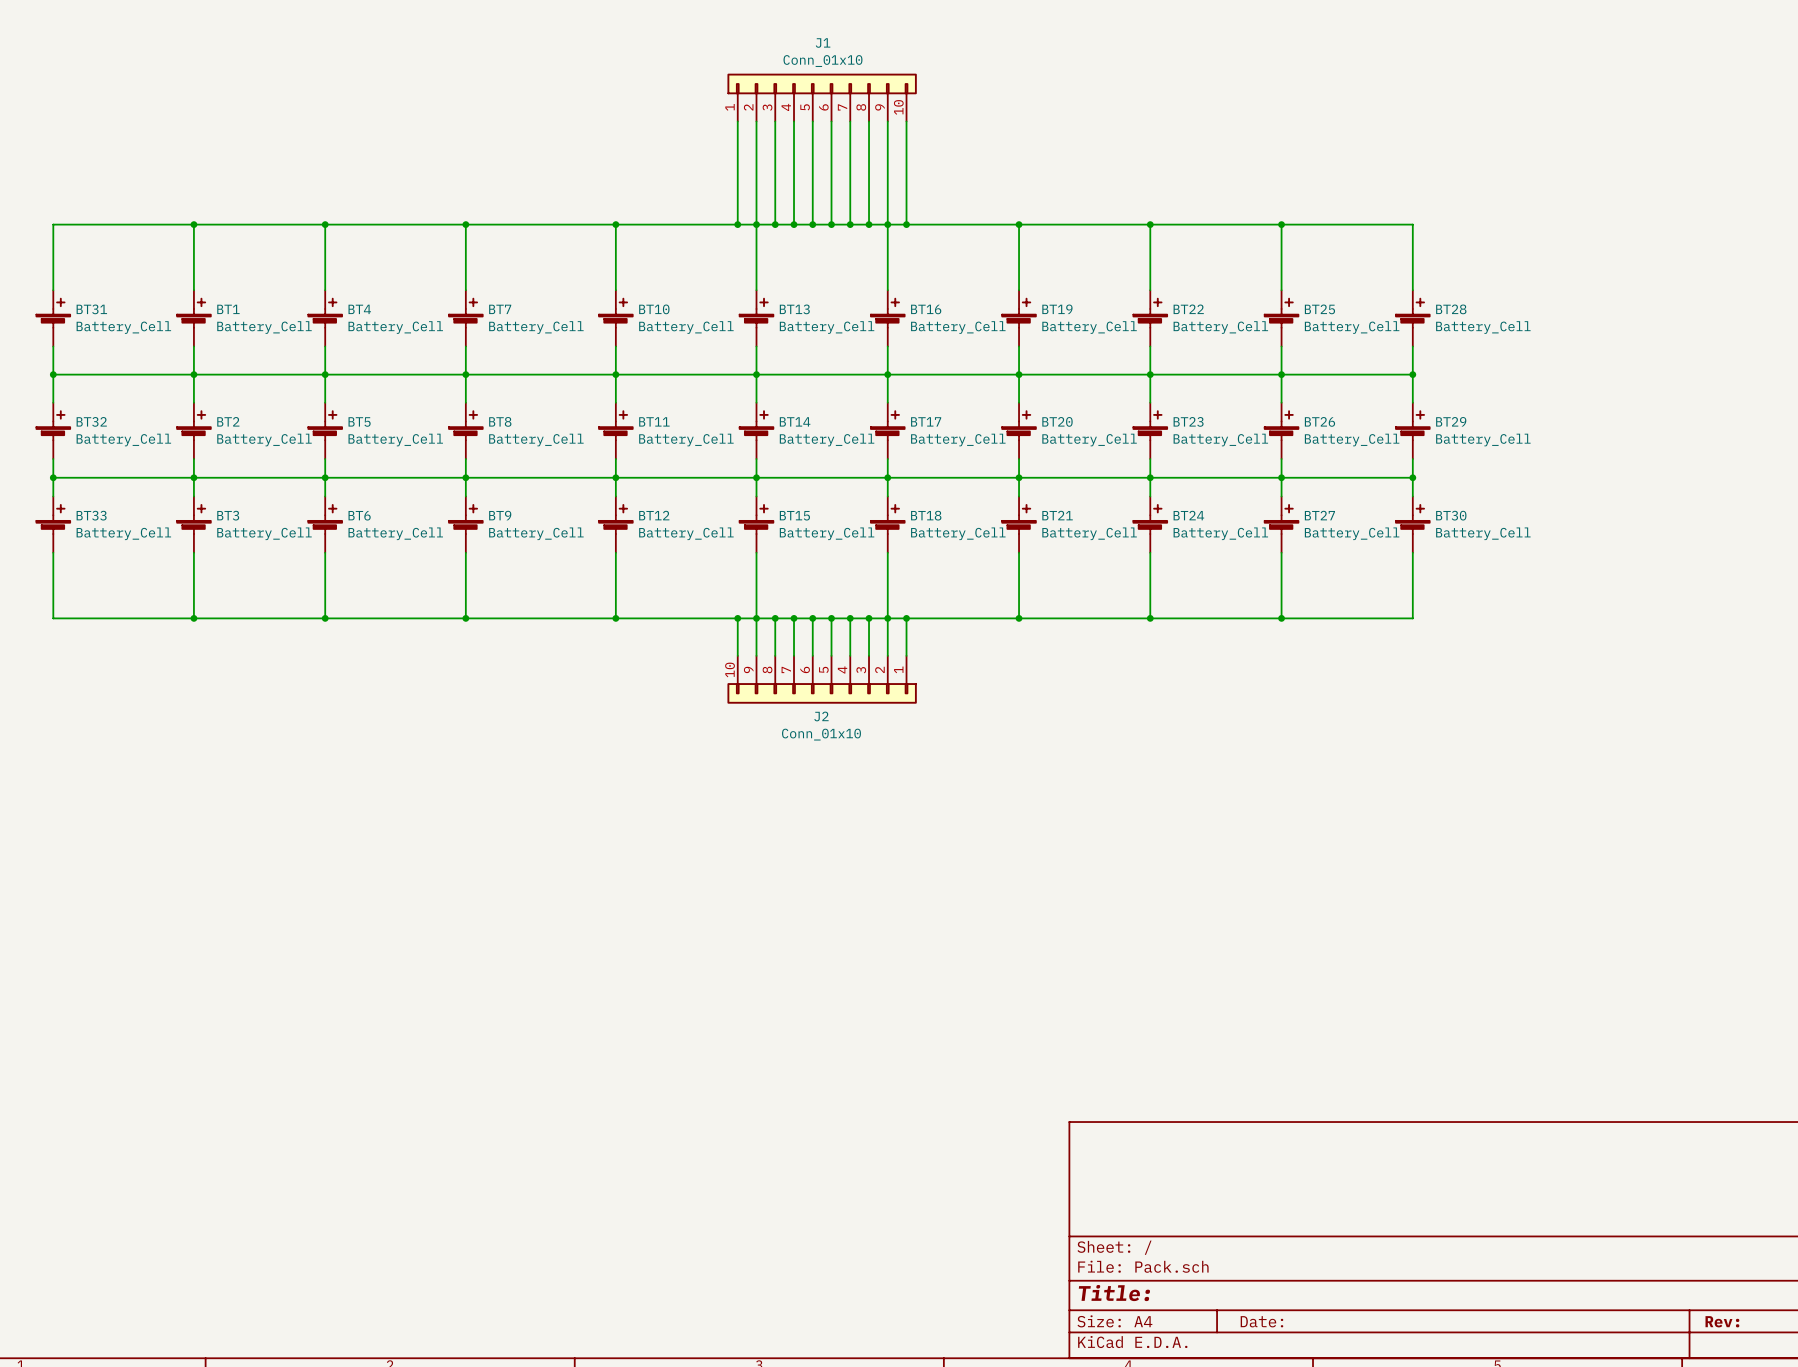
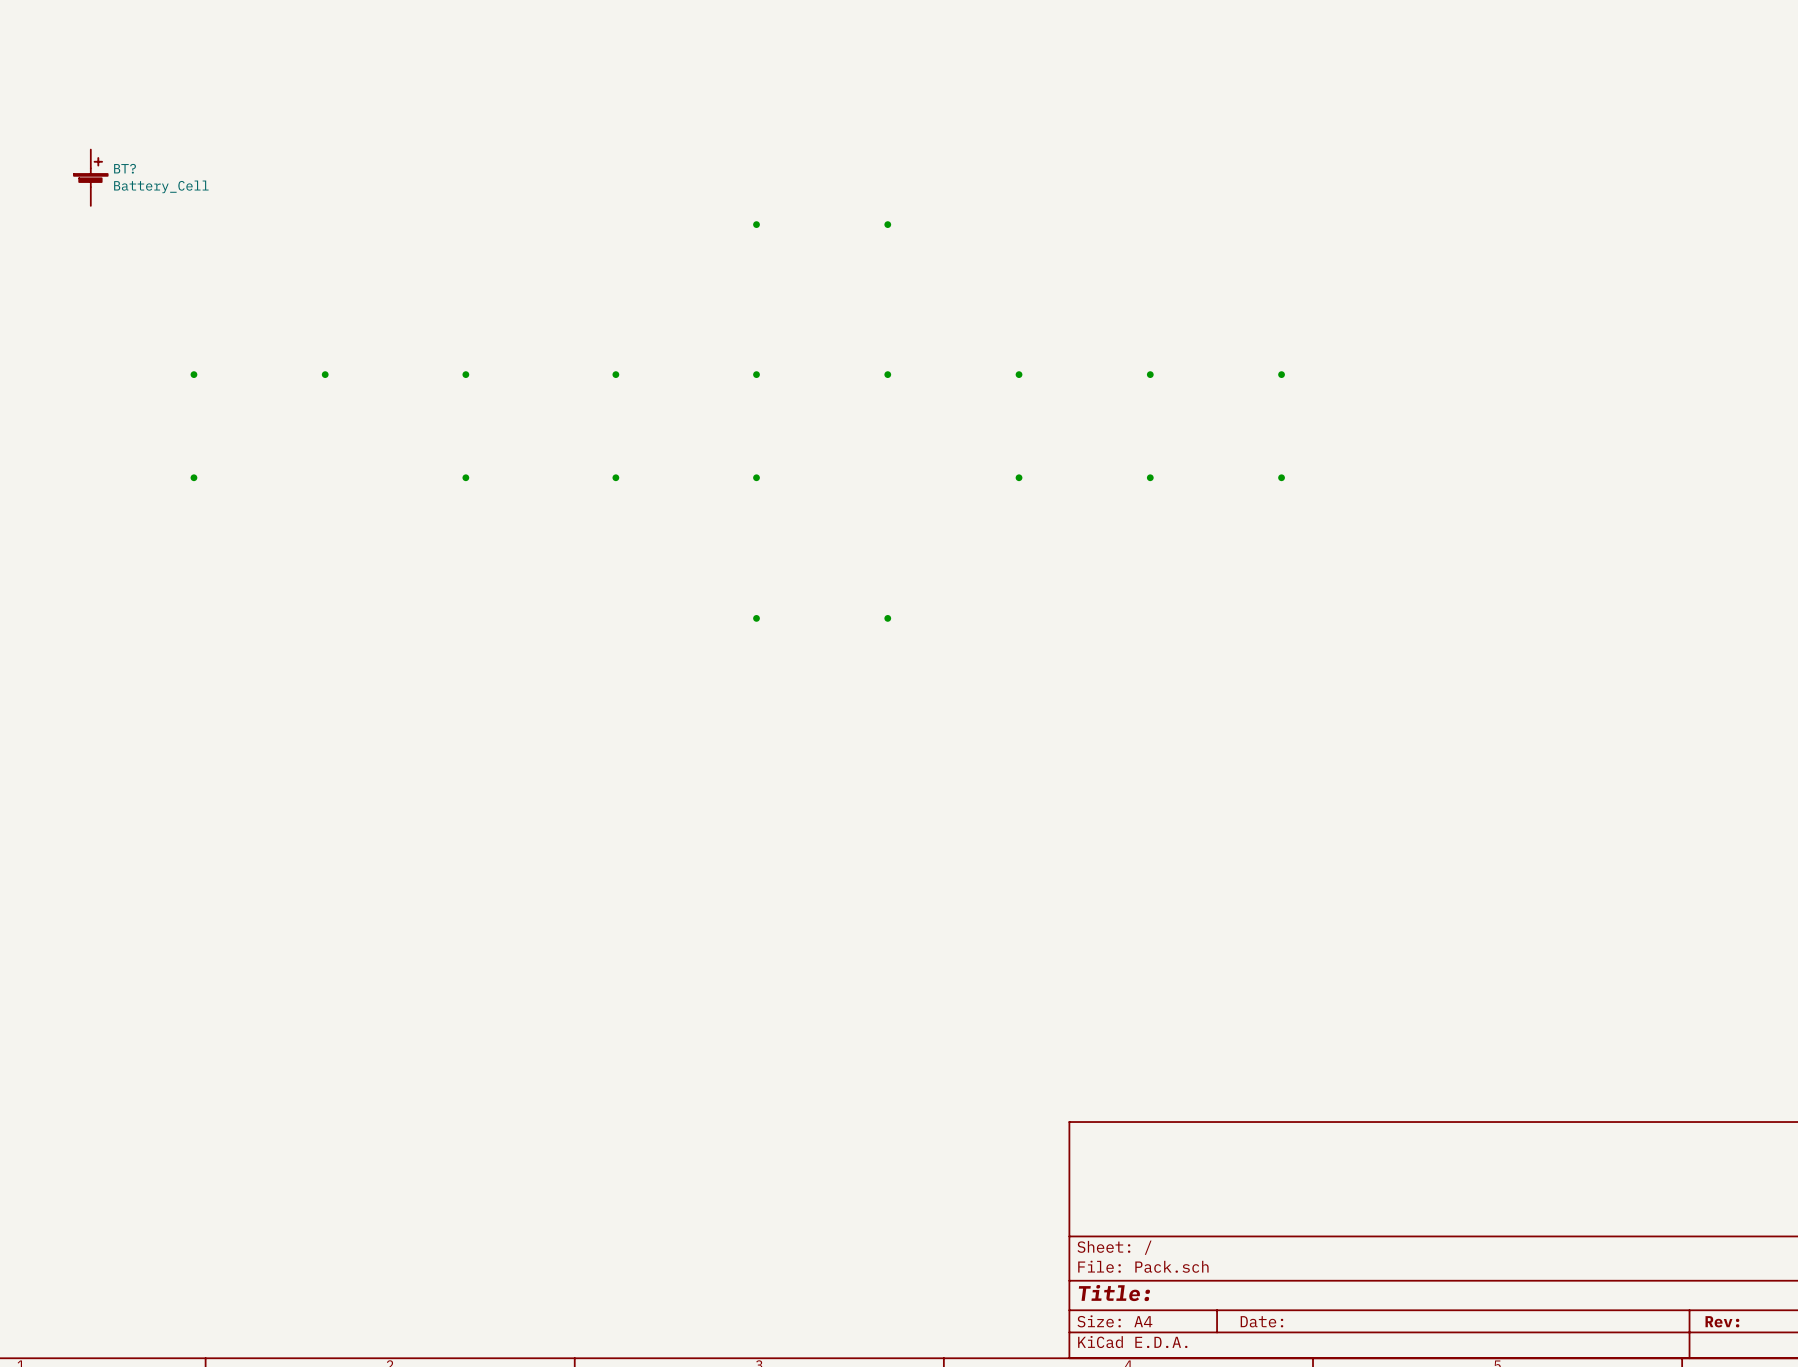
J1: Conn_01x10 (822, 97) -> none
wire: (737, 121) (737, 224) -> none
wire: (756, 121) (756, 290) -> none
wire: (775, 121) (775, 224) -> none
wire: (794, 121) (794, 224) -> none
wire: (812, 121) (812, 224) -> none
wire: (831, 121) (831, 224) -> none
wire: (850, 121) (850, 224) -> none
wire: (869, 121) (869, 224) -> none
wire: (887, 121) (887, 290) -> none
wire: (906, 121) (906, 224) -> none
BT?: none -> Battery_Cell (90, 177)
wire: (193, 224) (193, 290) -> none
junction: (193, 224) -> none
wire: (325, 224) (325, 290) -> none
junction: (325, 224) -> none
wire: (465, 224) (465, 290) -> none
junction: (465, 224) -> none
wire: (615, 224) (615, 290) -> none
junction: (615, 224) -> none
junction: (737, 224) -> none
junction: (775, 224) -> none
junction: (794, 224) -> none
junction: (812, 224) -> none
junction: (831, 224) -> none
junction: (850, 224) -> none
junction: (869, 224) -> none
junction: (906, 224) -> none
wire: (1019, 224) (1019, 290) -> none
junction: (1019, 224) -> none
wire: (1150, 224) (1150, 290) -> none
junction: (1150, 224) -> none
wire: (1281, 224) (1281, 290) -> none
junction: (1281, 224) -> none
wire: (53, 290) (53, 224) (1412, 224) (1412, 290) -> none
BT31: Battery_Cell (53, 318) -> none
BT1: Battery_Cell (193, 318) -> none
BT4: Battery_Cell (325, 318) -> none
BT7: Battery_Cell (465, 318) -> none
BT10: Battery_Cell (615, 318) -> none
BT13: Battery_Cell (756, 318) -> none
BT16: Battery_Cell (887, 318) -> none
BT19: Battery_Cell (1019, 318) -> none
BT22: Battery_Cell (1150, 318) -> none
BT25: Battery_Cell (1281, 318) -> none
BT28: Battery_Cell (1412, 318) -> none
wire: (53, 346) (53, 402) -> none
wire: (193, 346) (193, 402) -> none
wire: (325, 346) (325, 402) -> none
wire: (465, 346) (465, 402) -> none
wire: (615, 346) (615, 402) -> none
wire: (756, 346) (756, 402) -> none
wire: (887, 346) (887, 402) -> none
wire: (1019, 346) (1019, 402) -> none
wire: (1150, 346) (1150, 402) -> none
wire: (1281, 346) (1281, 402) -> none
wire: (1412, 346) (1412, 402) -> none
wire: (53, 374) (1412, 374) -> none
junction: (53, 374) -> none
junction: (1412, 374) -> none
BT32: Battery_Cell (53, 430) -> none
BT2: Battery_Cell (193, 430) -> none
BT5: Battery_Cell (325, 430) -> none
BT8: Battery_Cell (465, 430) -> none
BT11: Battery_Cell (615, 430) -> none
BT14: Battery_Cell (756, 430) -> none
BT17: Battery_Cell (887, 430) -> none
BT20: Battery_Cell (1019, 430) -> none
BT23: Battery_Cell (1150, 430) -> none
BT26: Battery_Cell (1281, 430) -> none
BT29: Battery_Cell (1412, 430) -> none
wire: (53, 459) (53, 496) -> none
wire: (193, 459) (193, 496) -> none
wire: (325, 459) (325, 496) -> none
wire: (465, 459) (465, 496) -> none
wire: (615, 459) (615, 496) -> none
wire: (756, 459) (756, 496) -> none
wire: (887, 459) (887, 496) -> none
wire: (1019, 459) (1019, 496) -> none
wire: (1150, 459) (1150, 496) -> none
wire: (1281, 459) (1281, 496) -> none
wire: (1412, 459) (1412, 496) -> none
wire: (53, 477) (1412, 477) -> none
junction: (53, 477) -> none
junction: (325, 477) -> none
junction: (887, 477) -> none
junction: (1412, 477) -> none
BT33: Battery_Cell (53, 524) -> none
BT3: Battery_Cell (193, 524) -> none
BT6: Battery_Cell (325, 524) -> none
BT9: Battery_Cell (465, 524) -> none
BT12: Battery_Cell (615, 524) -> none
BT15: Battery_Cell (756, 524) -> none
BT18: Battery_Cell (887, 524) -> none
BT21: Battery_Cell (1019, 524) -> none
BT24: Battery_Cell (1150, 524) -> none
BT27: Battery_Cell (1281, 524) -> none
BT30: Battery_Cell (1412, 524) -> none
wire: (53, 552) (53, 618) (1412, 618) (1412, 552) -> none
wire: (193, 552) (193, 618) -> none
wire: (325, 552) (325, 618) -> none
wire: (465, 552) (465, 618) -> none
wire: (615, 552) (615, 618) -> none
wire: (756, 552) (756, 655) -> none
wire: (887, 552) (887, 655) -> none
wire: (1019, 552) (1019, 618) -> none
wire: (1150, 552) (1150, 618) -> none
wire: (1281, 552) (1281, 618) -> none
junction: (193, 618) -> none
junction: (325, 618) -> none
junction: (465, 618) -> none
junction: (615, 618) -> none
wire: (737, 618) (737, 655) -> none
junction: (737, 618) -> none
wire: (775, 618) (775, 655) -> none
junction: (775, 618) -> none
wire: (794, 618) (794, 655) -> none
junction: (794, 618) -> none
wire: (812, 618) (812, 655) -> none
junction: (812, 618) -> none
wire: (831, 618) (831, 655) -> none
junction: (831, 618) -> none
wire: (850, 618) (850, 655) -> none
junction: (850, 618) -> none
wire: (869, 618) (869, 655) -> none
junction: (869, 618) -> none
wire: (906, 618) (906, 655) -> none
junction: (906, 618) -> none
junction: (1019, 618) -> none
junction: (1150, 618) -> none
junction: (1281, 618) -> none
J2: Conn_01x10 (822, 679) -> none

